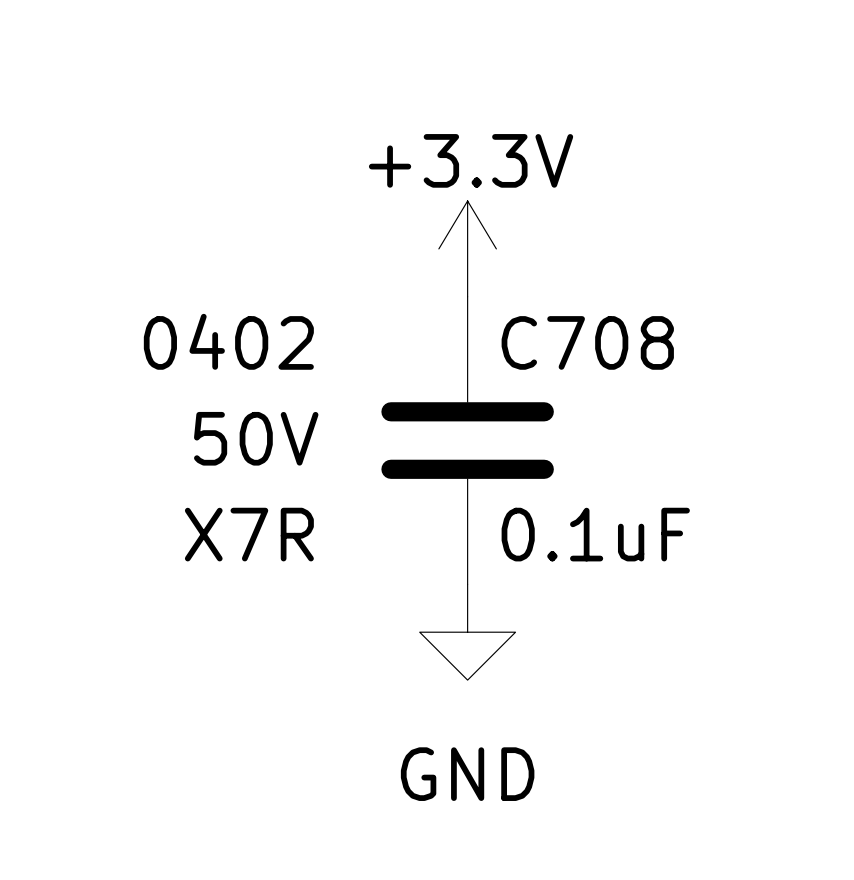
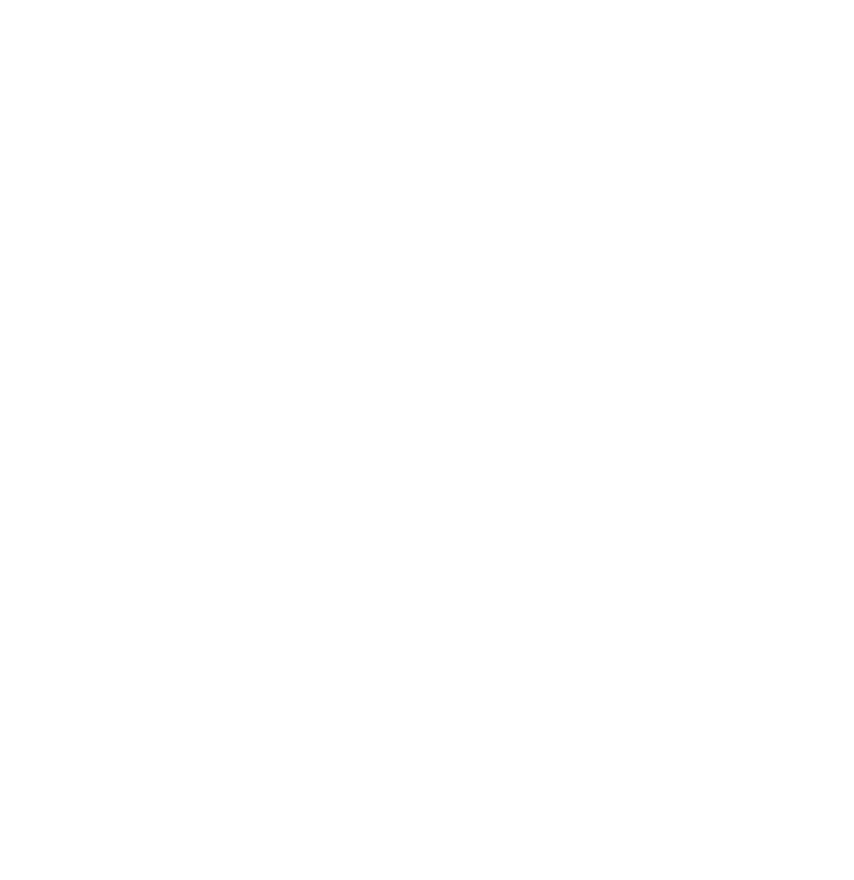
power symbol: +3.3V (467, 248) -> none
C708: 0.1uF (467, 440) -> none
power symbol: GND (467, 632) -> none

